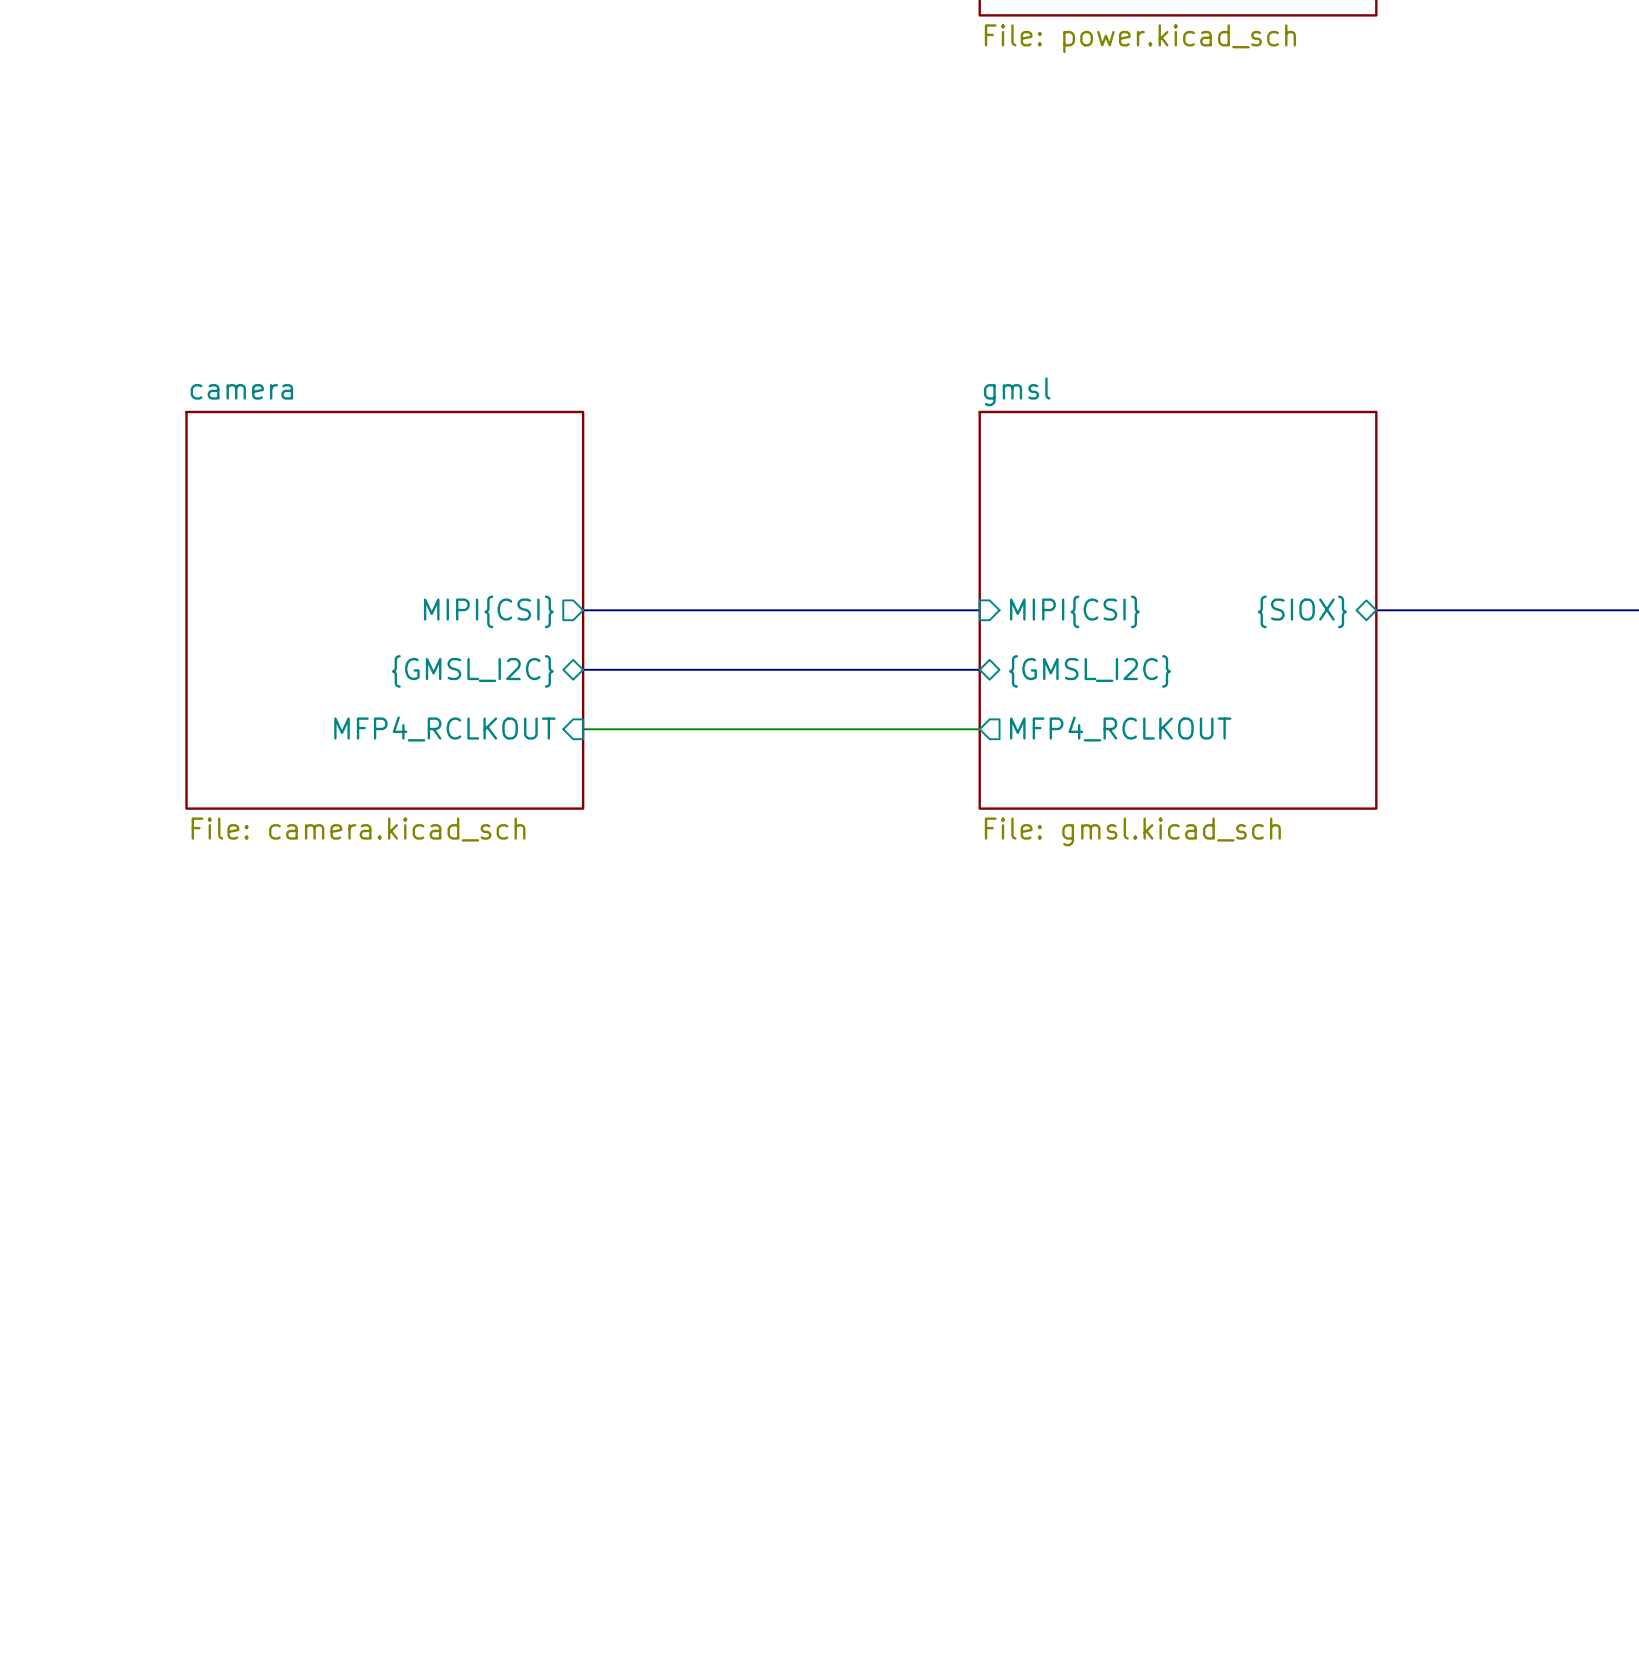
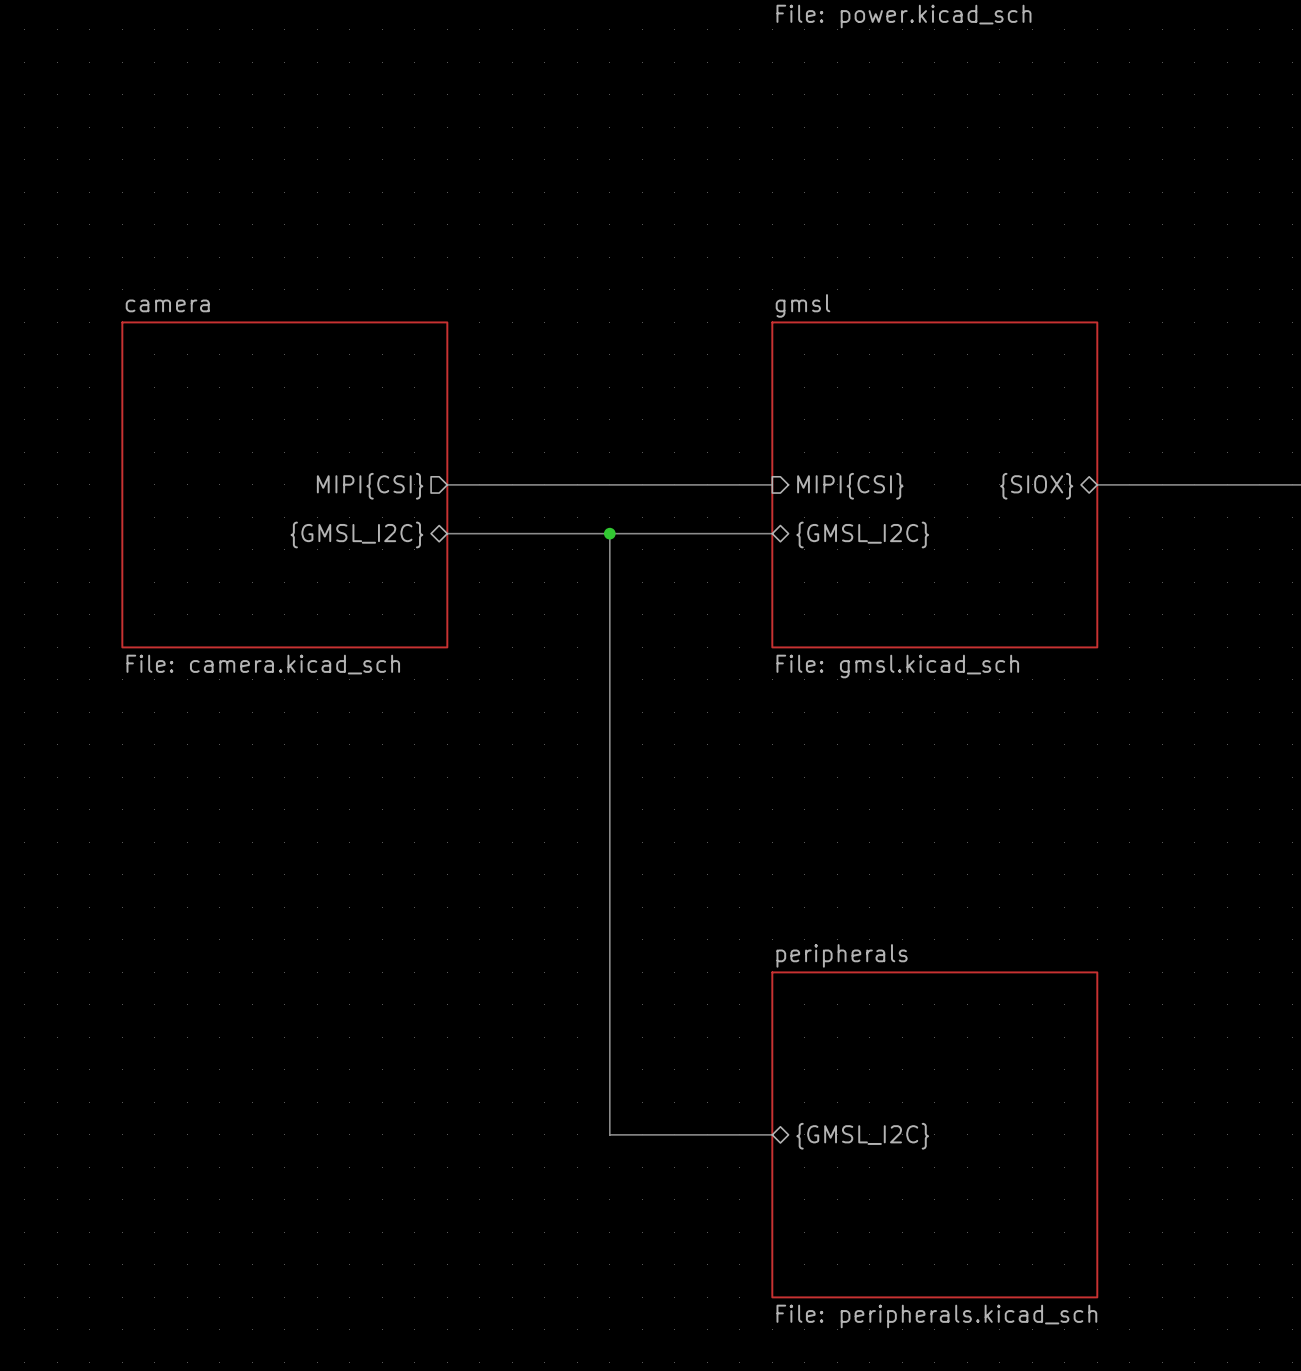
bus: none -> (609, 533) (609, 1134) (772, 1134)
junction: none -> (609, 533)
sheet pin: MFP4_RCLKOUT (444, 729) -> none
wire: (583, 729) (979, 729) -> none
sheet pin: MFP4_RCLKOUT (1120, 729) -> none
sheet peripherals: none -> File: peripherals.kicad_sch (934, 1134)
sheet pin: none -> {GMSL_I2C} (862, 1136)

